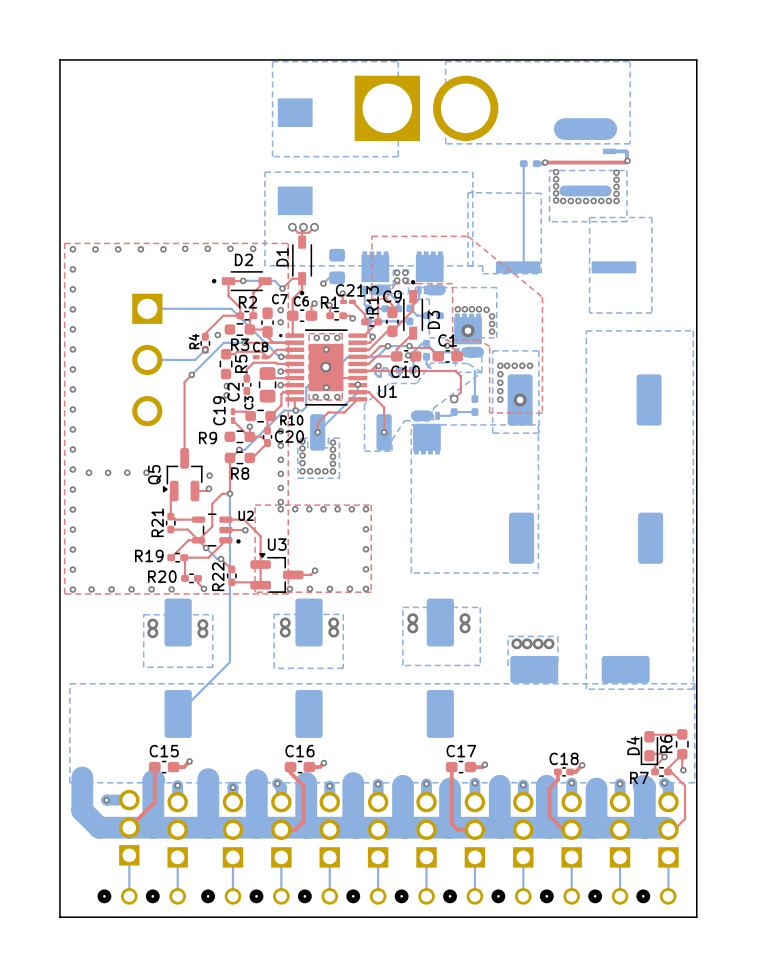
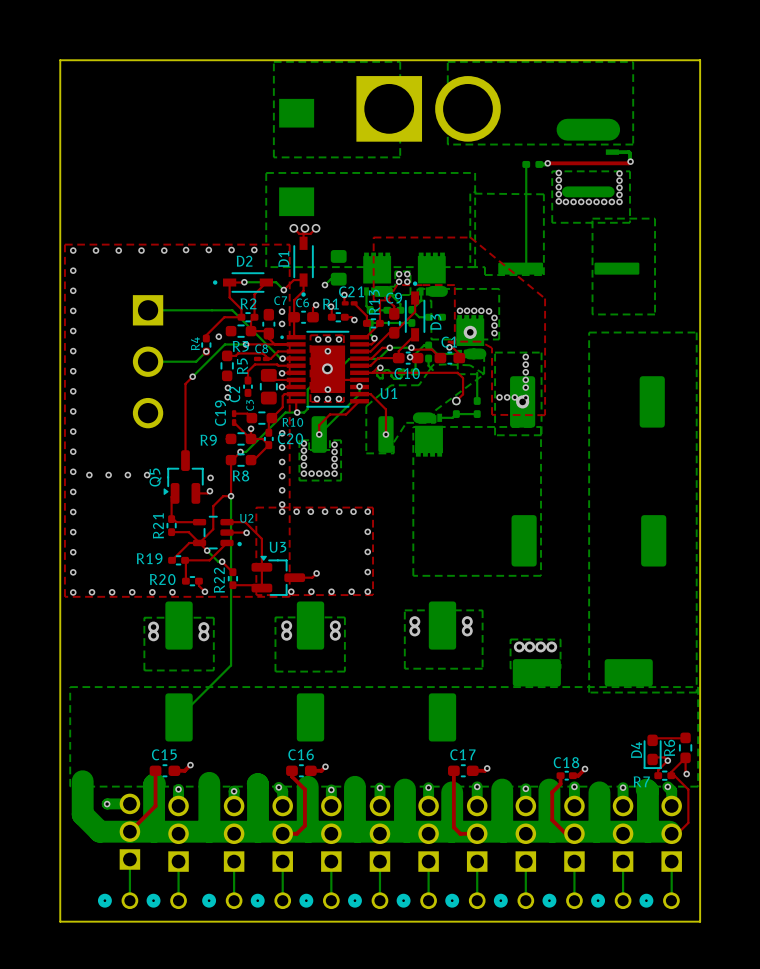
via: none -> (525, 356)
via: none -> (525, 364)
via: (500, 365) -> none
via: (507, 365) -> none
via: (514, 365) -> none
via: (522, 365) -> none
via: (529, 365) -> none
via: none -> (525, 372)
via: (500, 374) -> none
via: none -> (525, 379)
via: (500, 382) -> none
via: none -> (525, 387)
via: (500, 391) -> none
via: none -> (499, 397)
via: none -> (507, 397)
via: none -> (514, 397)
via: none -> (525, 397)
via: (500, 399) -> none

